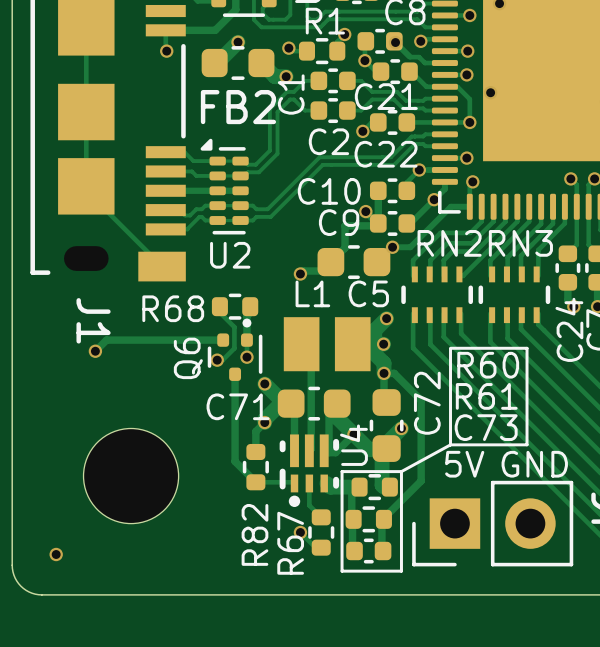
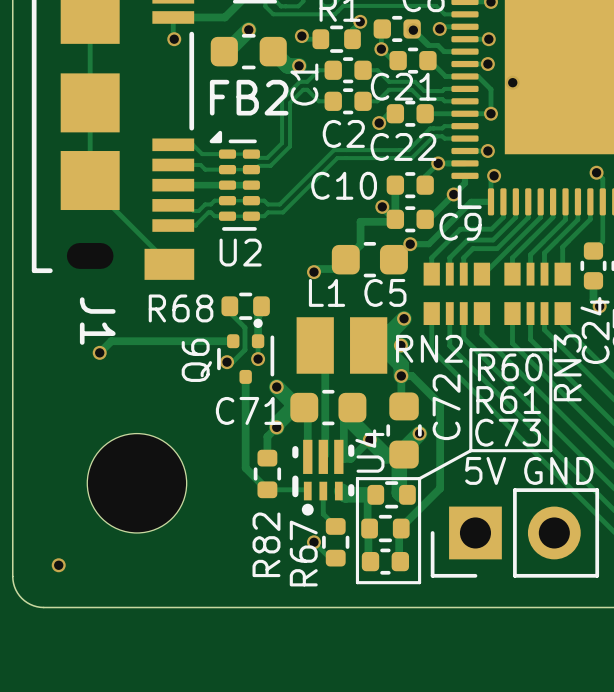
C9 name position: C9 (339, 222) -> C9 (460, 226)
RN2 name position: RN2 (449, 243) -> RN2 (429, 348)
RN3 name position: RN3 (520, 243) -> RN3 (567, 367)
RN2 footprint: [401, 266, 473, 324] -> [423, 262, 491, 326]
RN3 footprint: [478, 266, 551, 324] -> [504, 262, 571, 326]

